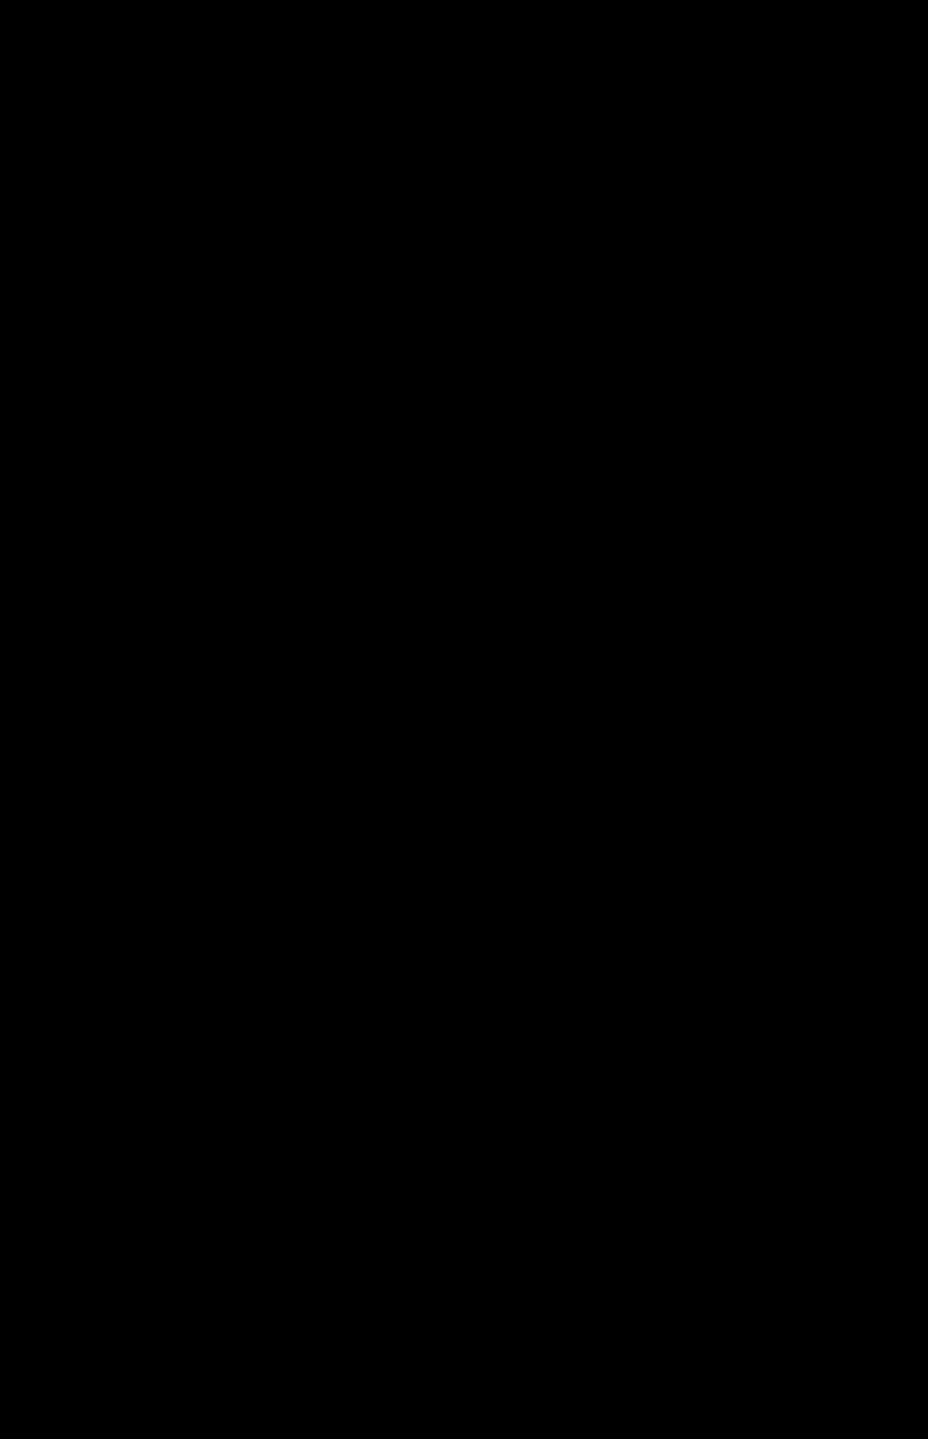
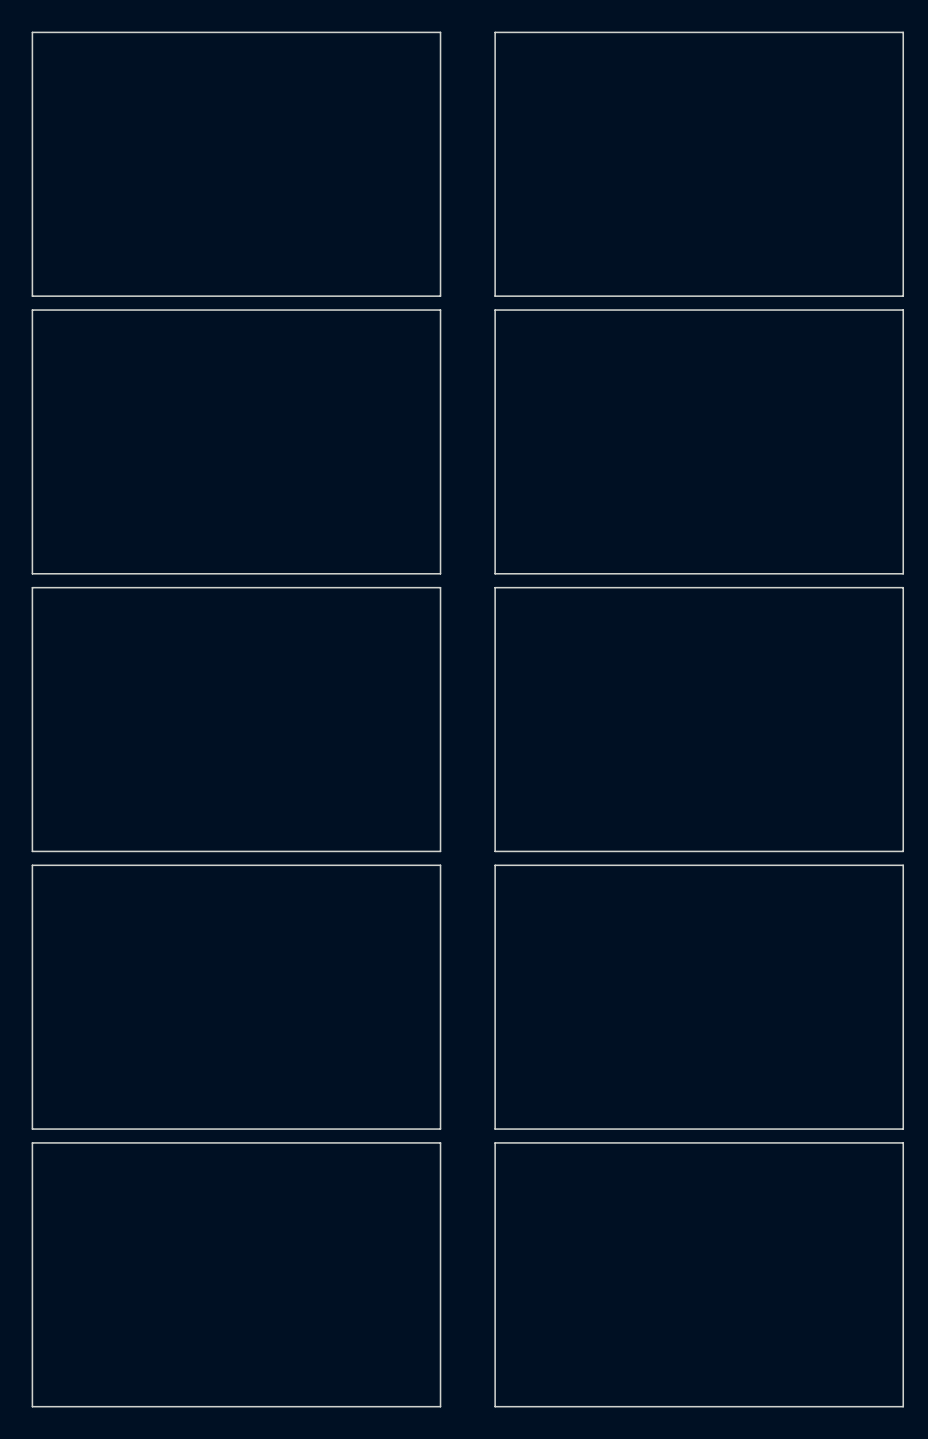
board edge: none -> (440, 32) (440, 296) (32, 296) (32, 32) (440, 32)
board edge: none -> (903, 32) (903, 296) (495, 296) (495, 32) (903, 32)
board edge: none -> (440, 310) (440, 573) (32, 573) (32, 310) (440, 310)
board edge: none -> (903, 310) (903, 573) (495, 573) (495, 310) (903, 310)
board edge: none -> (440, 587) (440, 851) (32, 851) (32, 587) (440, 587)
board edge: none -> (903, 587) (903, 851) (495, 851) (495, 587) (903, 587)
board edge: none -> (440, 865) (440, 1129) (32, 1129) (32, 865) (440, 865)
board edge: none -> (903, 865) (903, 1129) (495, 1129) (495, 865) (903, 865)
board edge: none -> (440, 1142) (440, 1406) (32, 1406) (32, 1142) (440, 1142)
board edge: none -> (903, 1142) (903, 1406) (495, 1406) (495, 1142) (903, 1142)

